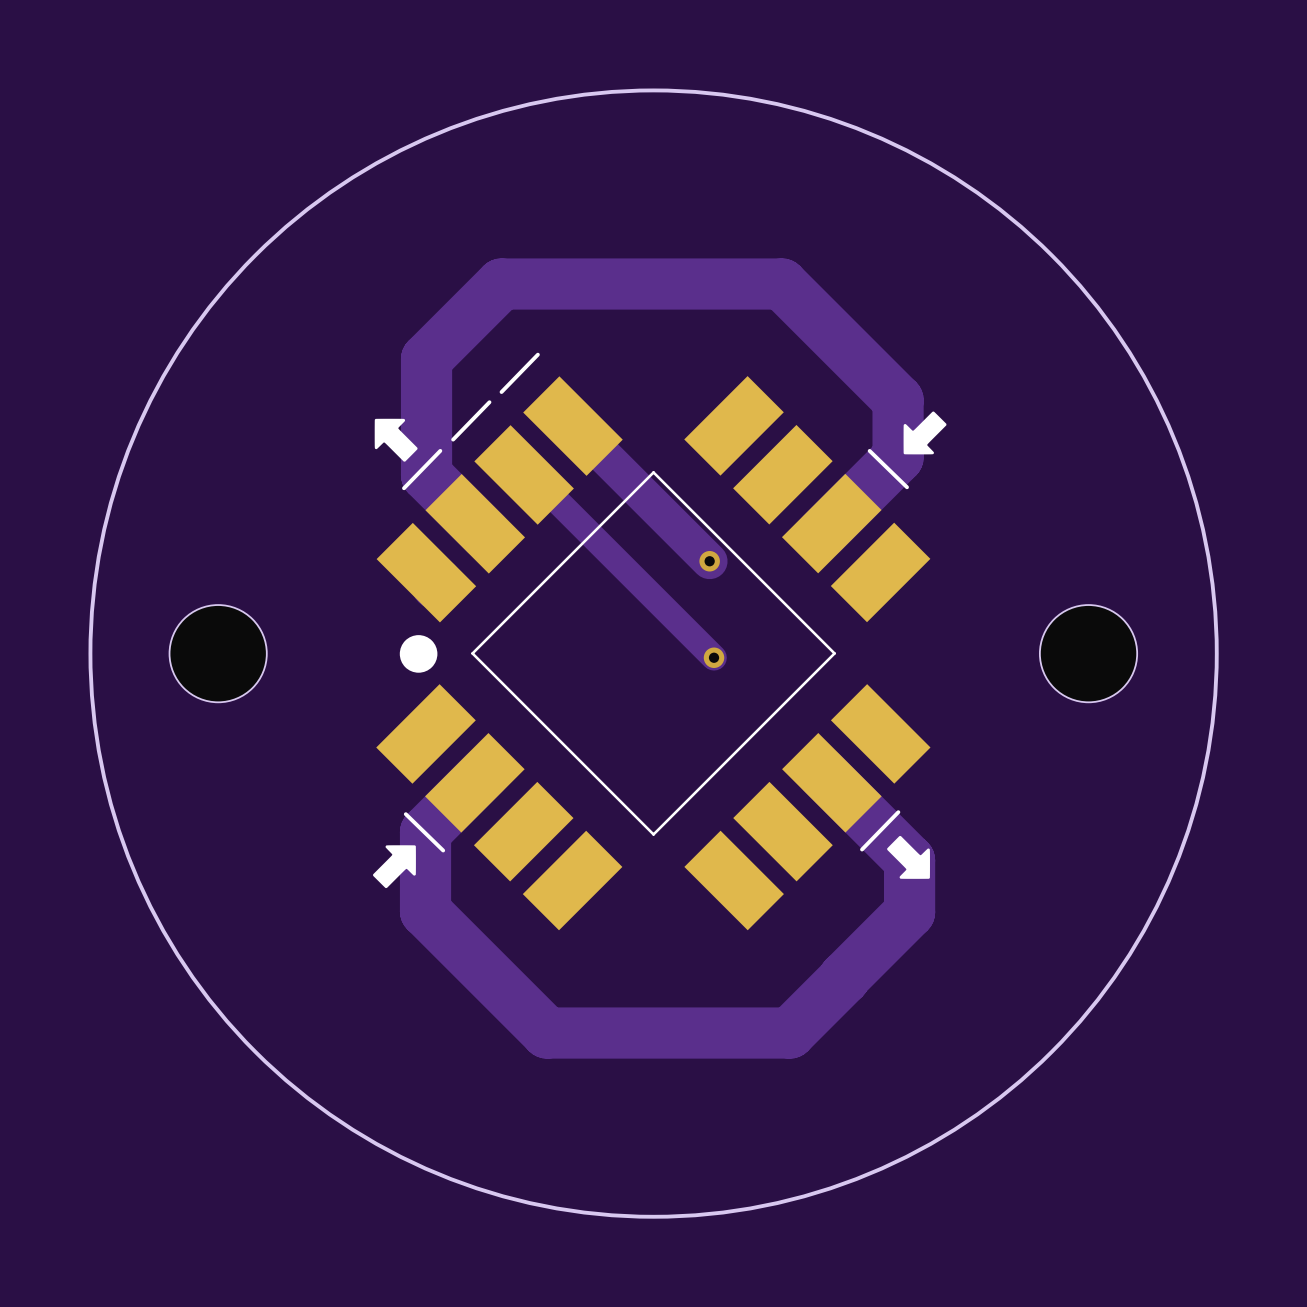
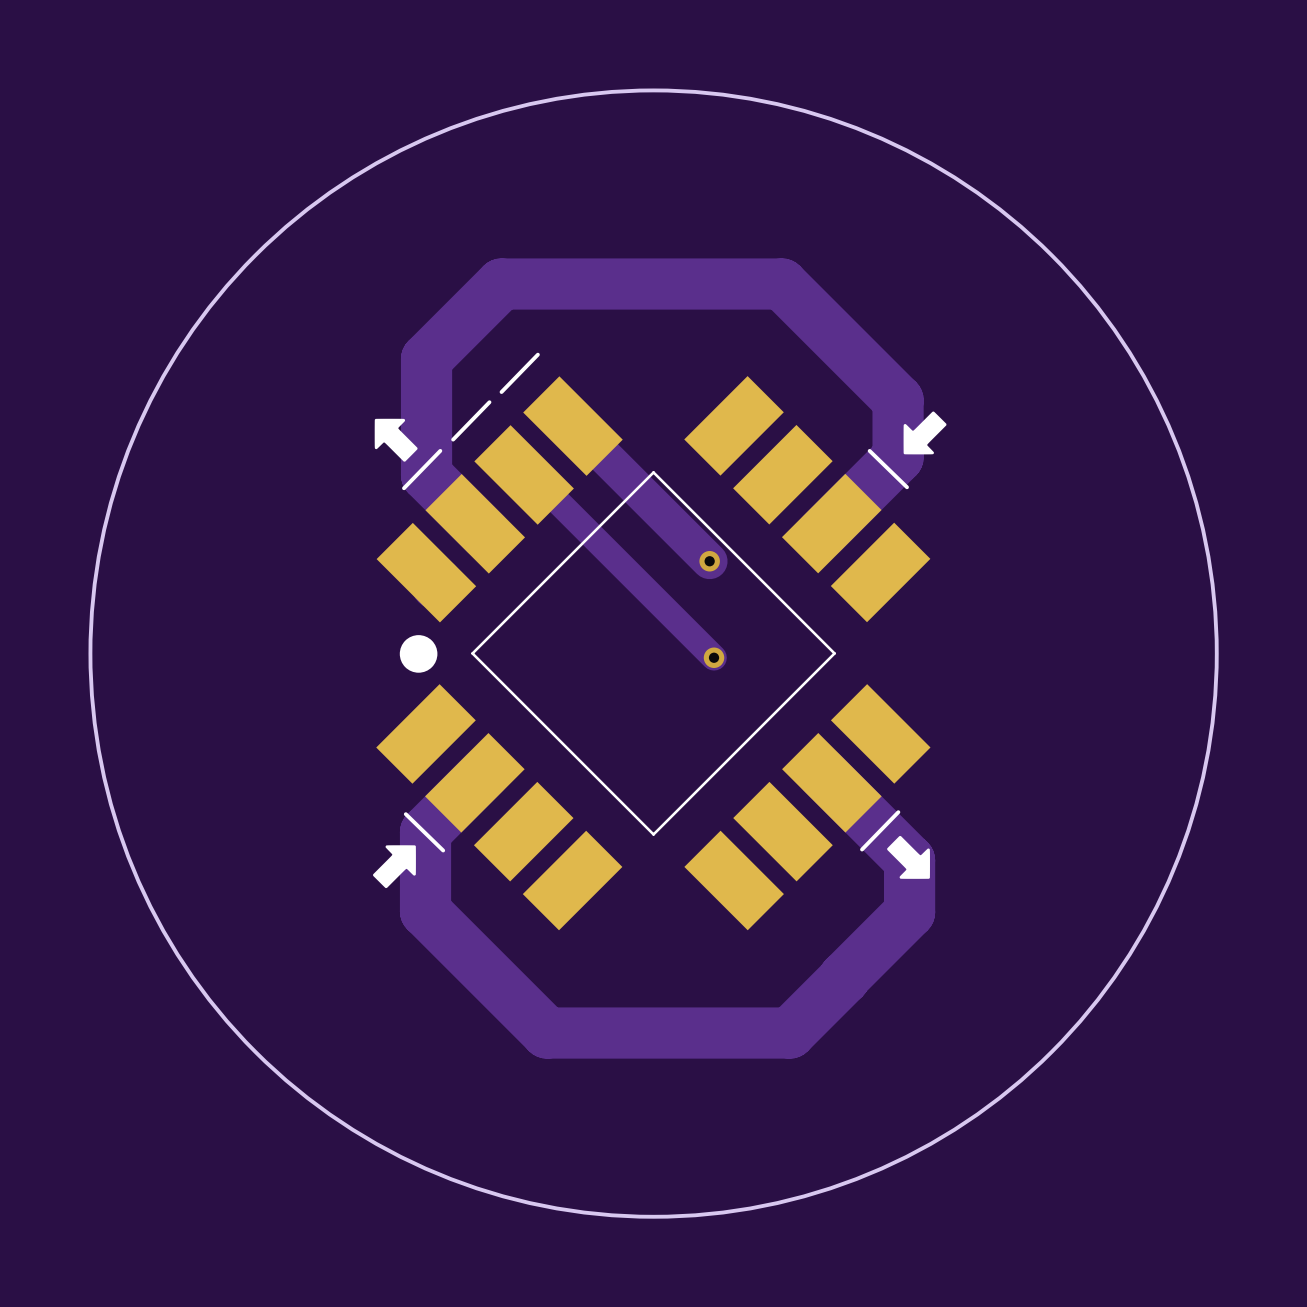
part: (218, 653) -> none
part: (1088, 653) -> none

